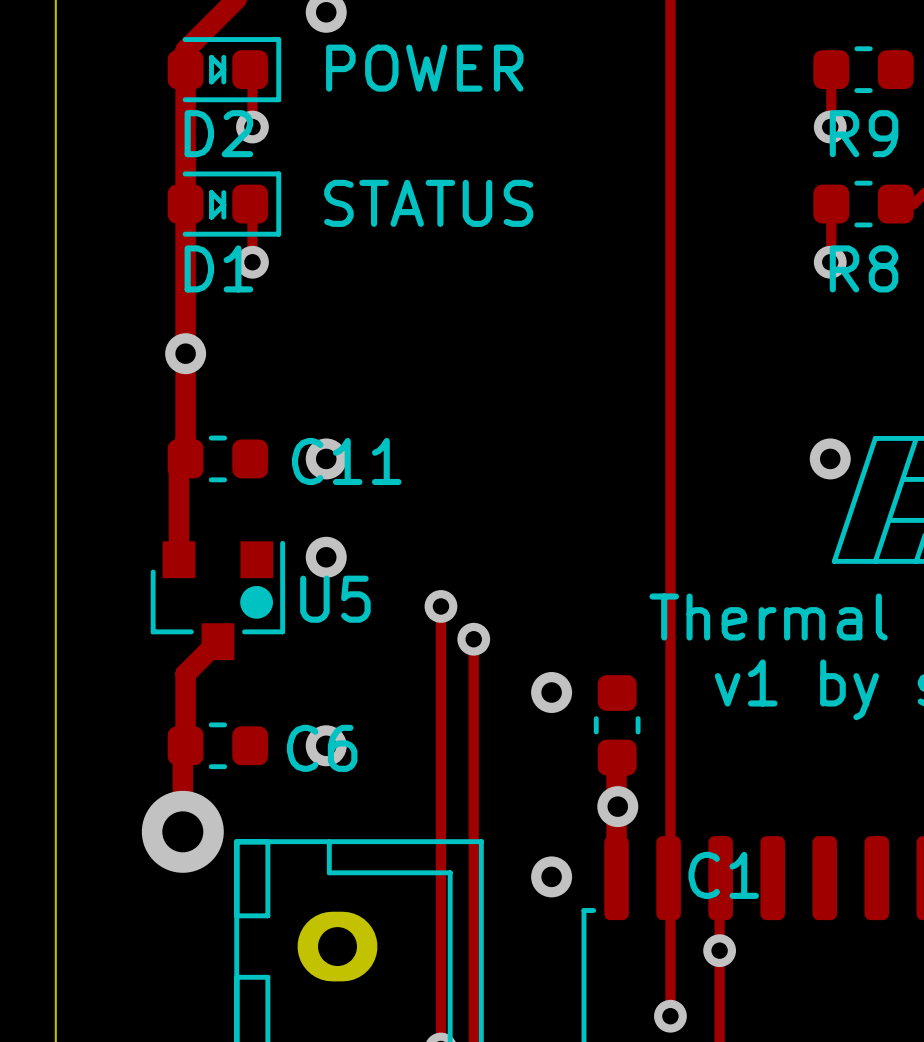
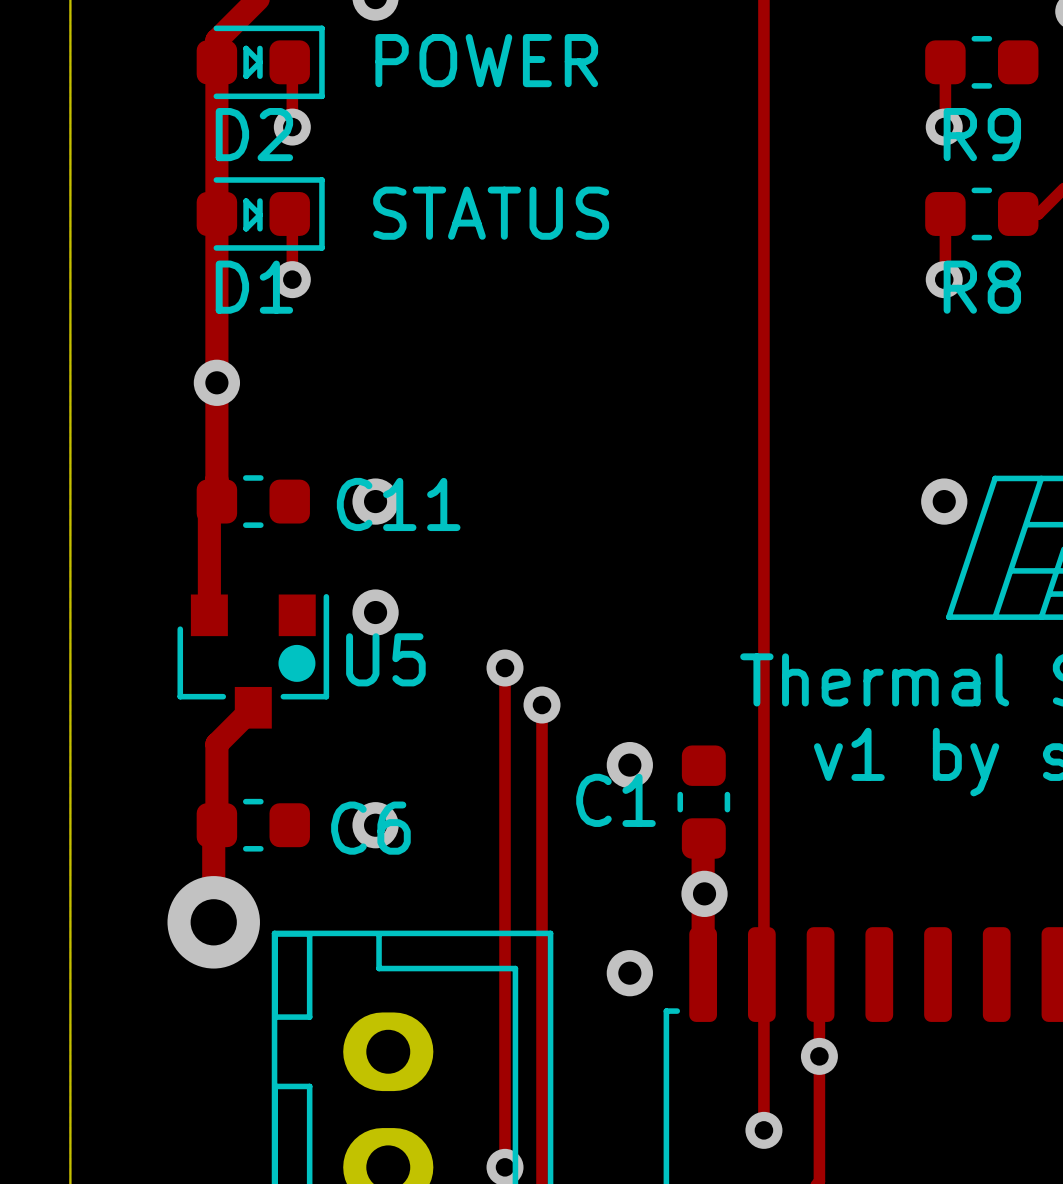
C1 name position: C1 (723, 875) -> C1 (615, 800)

